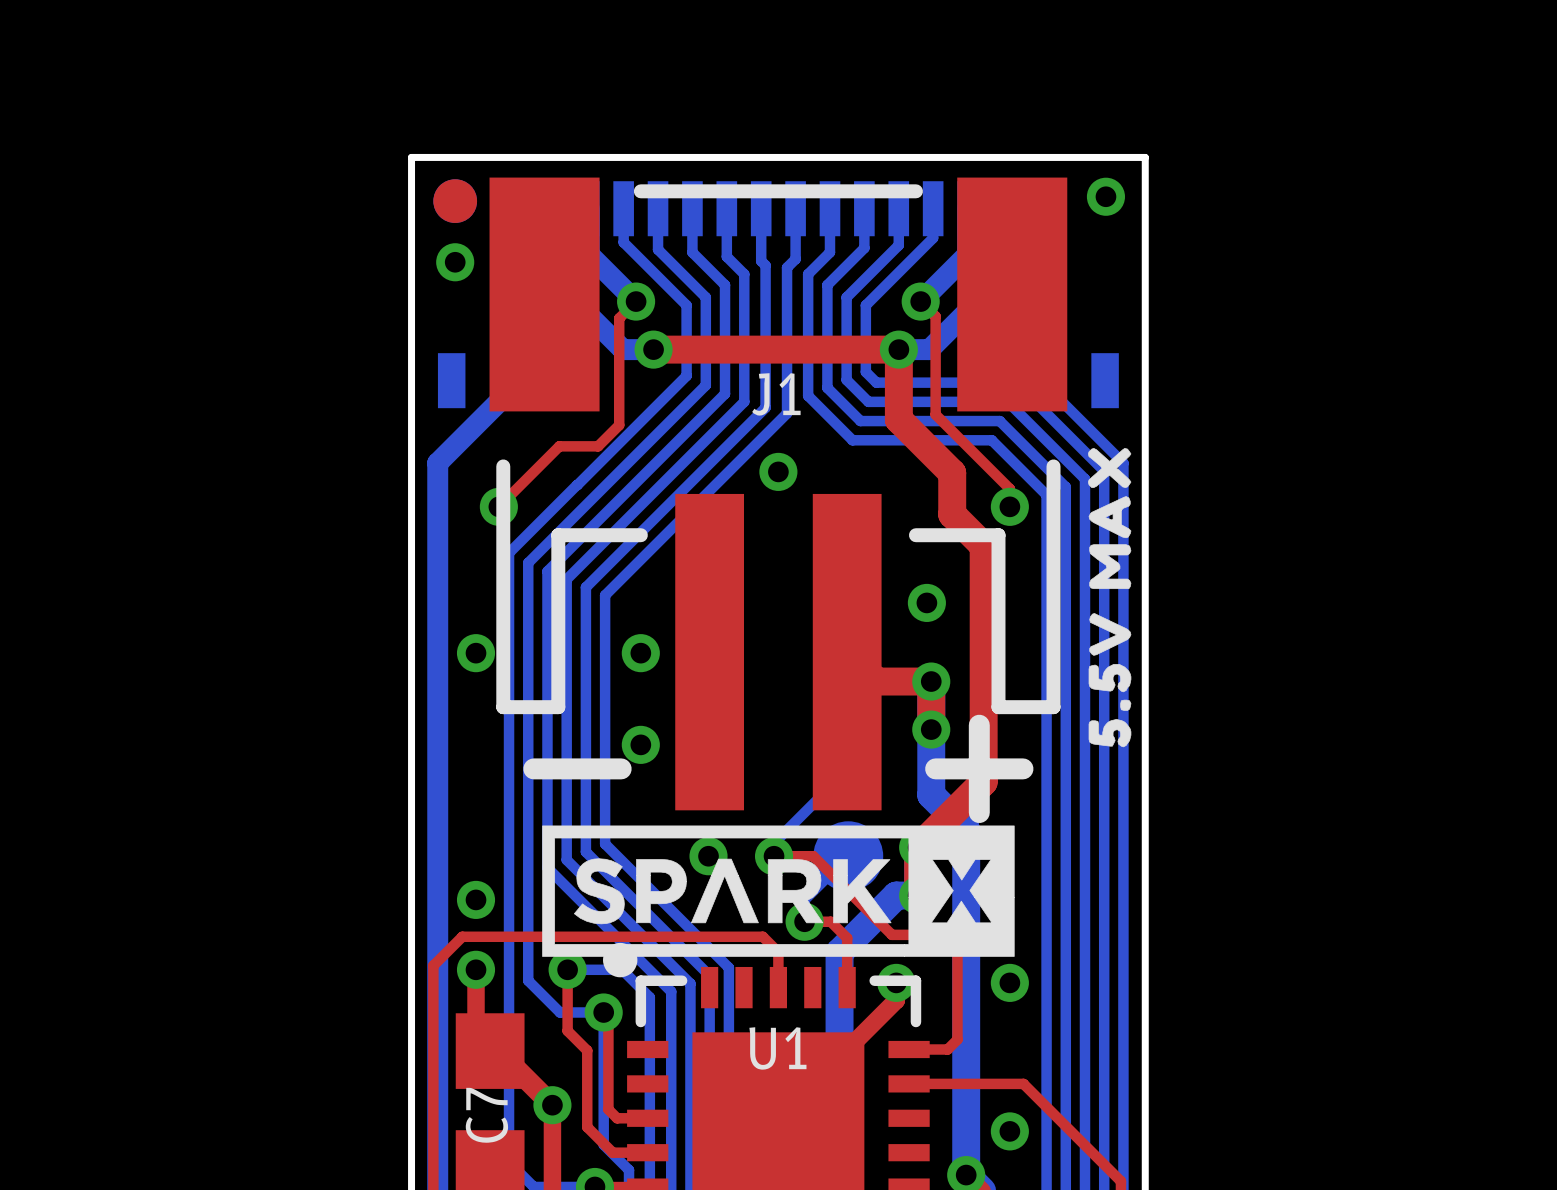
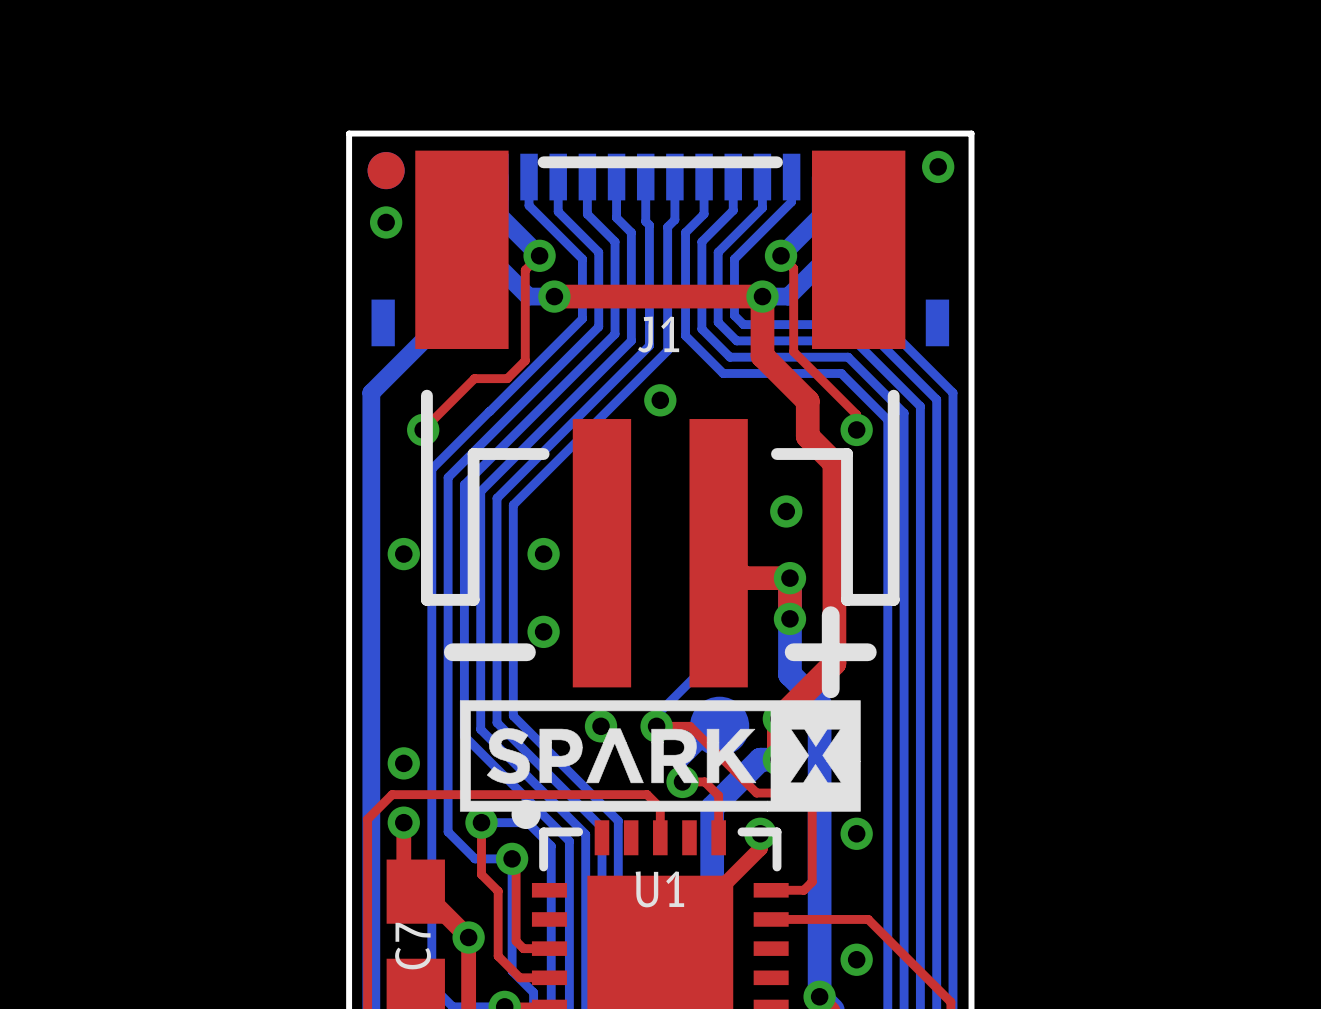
drawing: [1087, 448, 1132, 748] -> none

